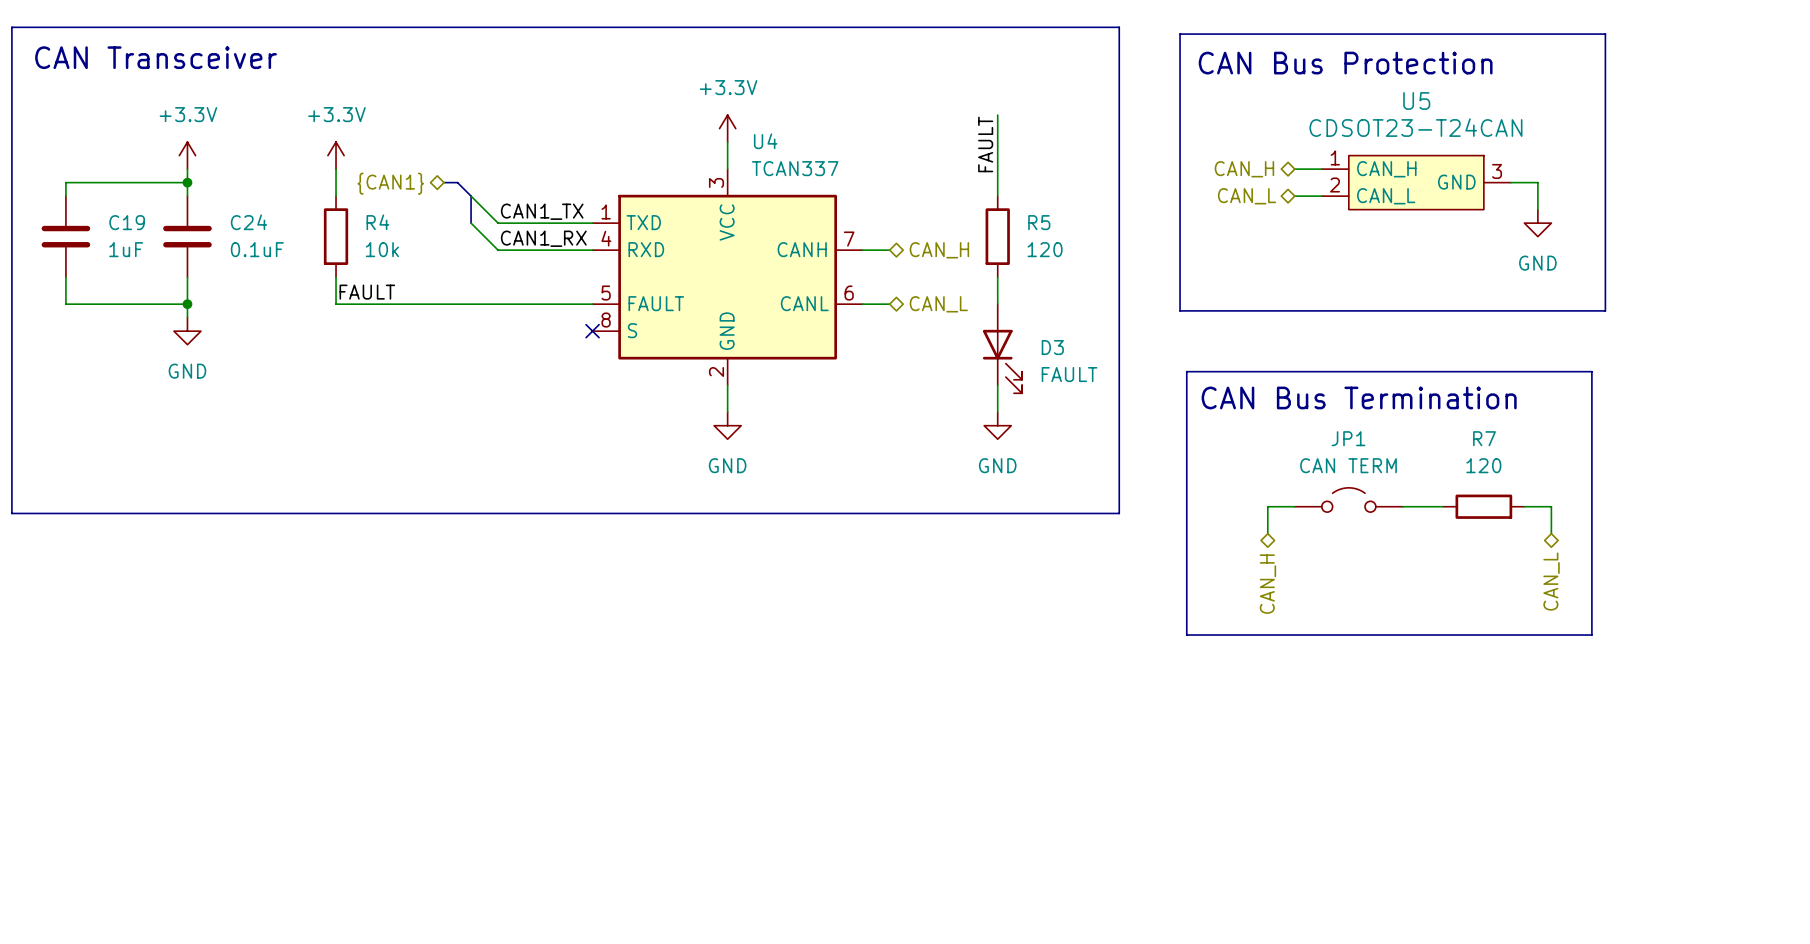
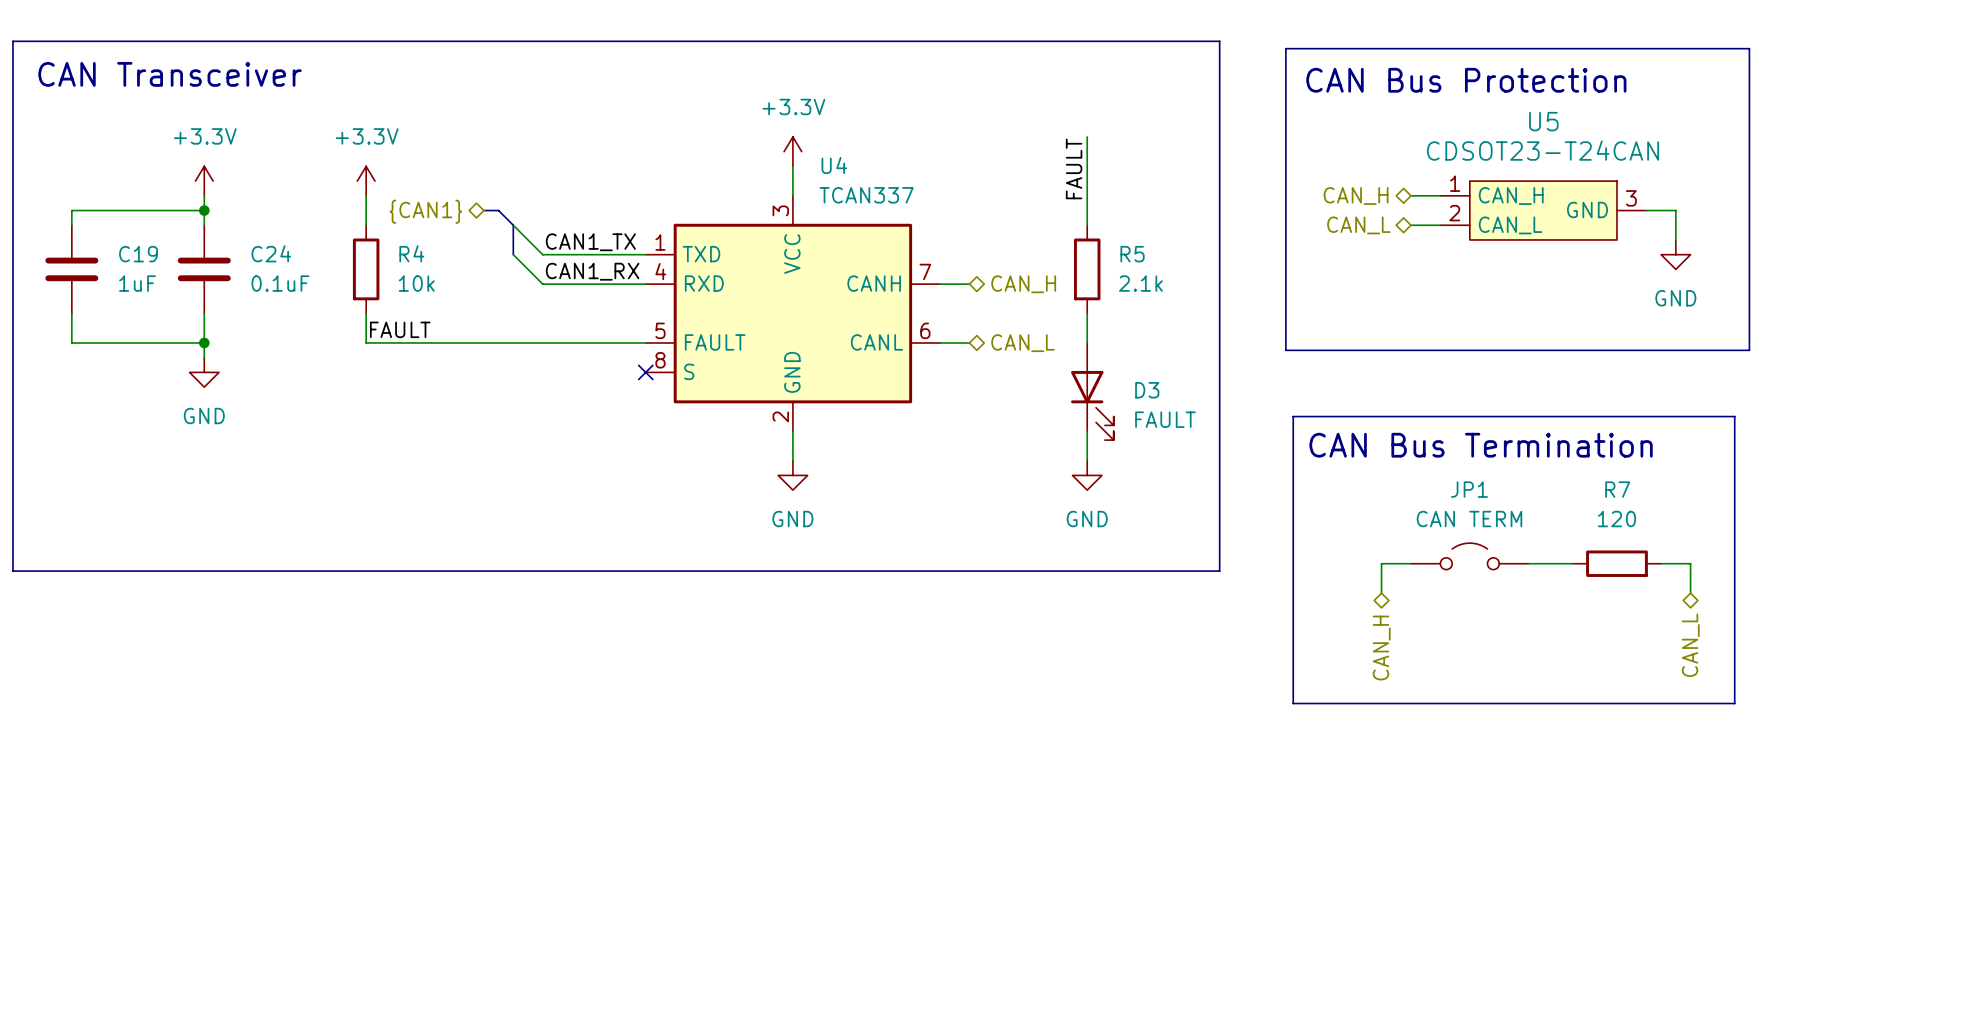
R5 value: 120 (1045, 249) -> 2.1k (1140, 283)

